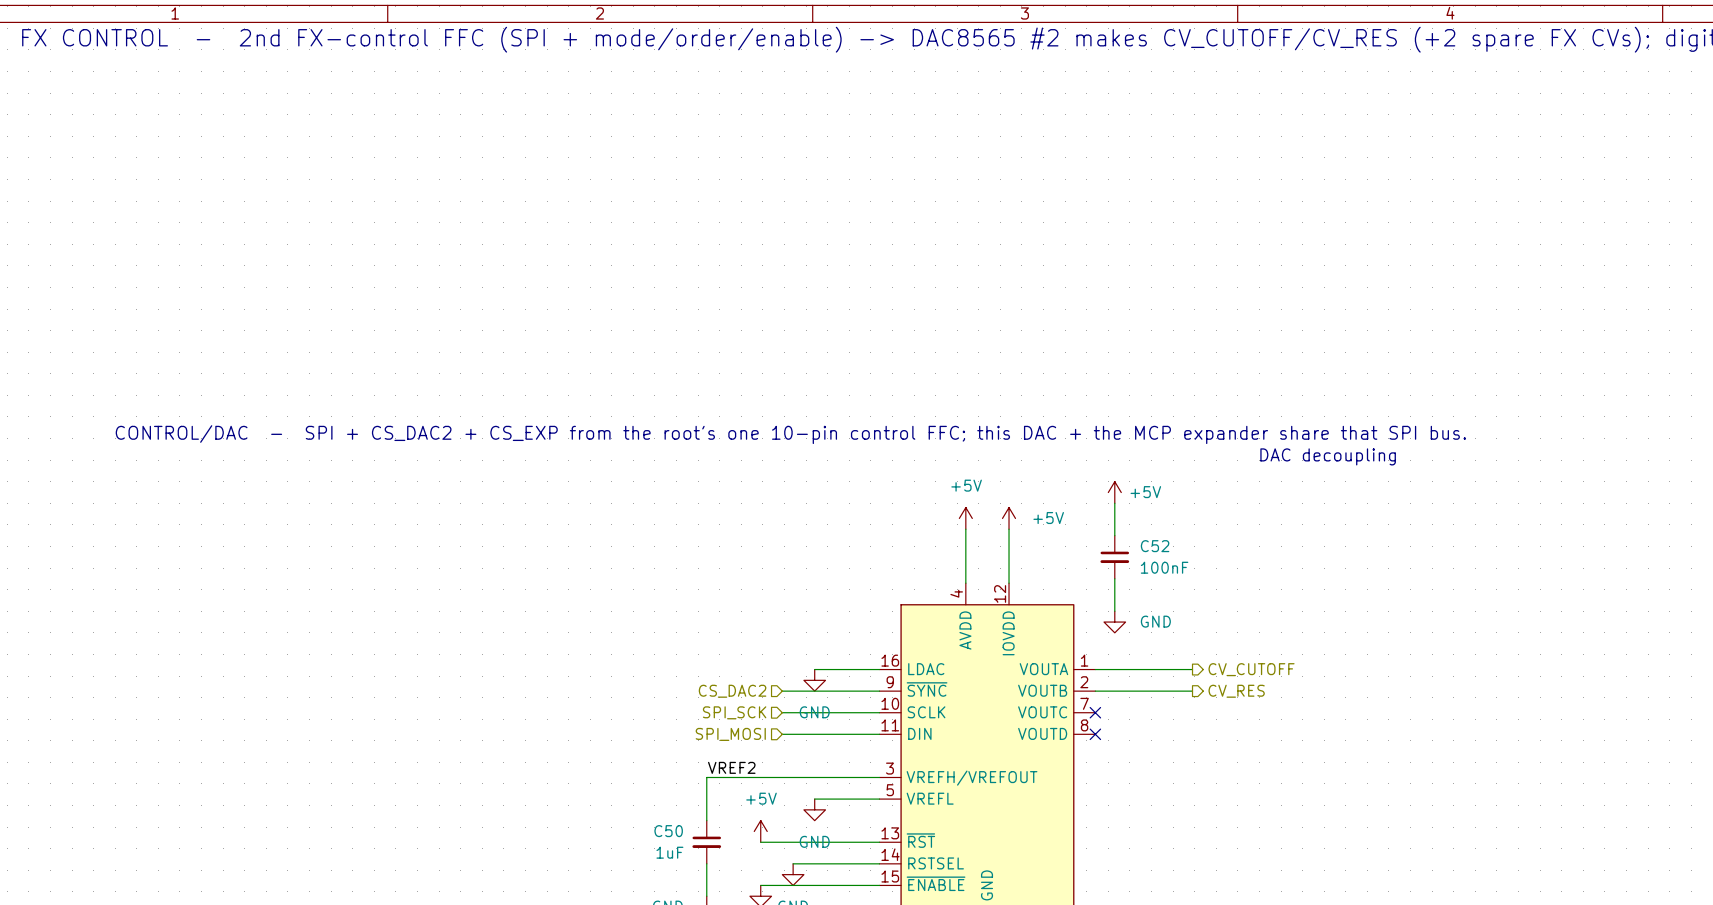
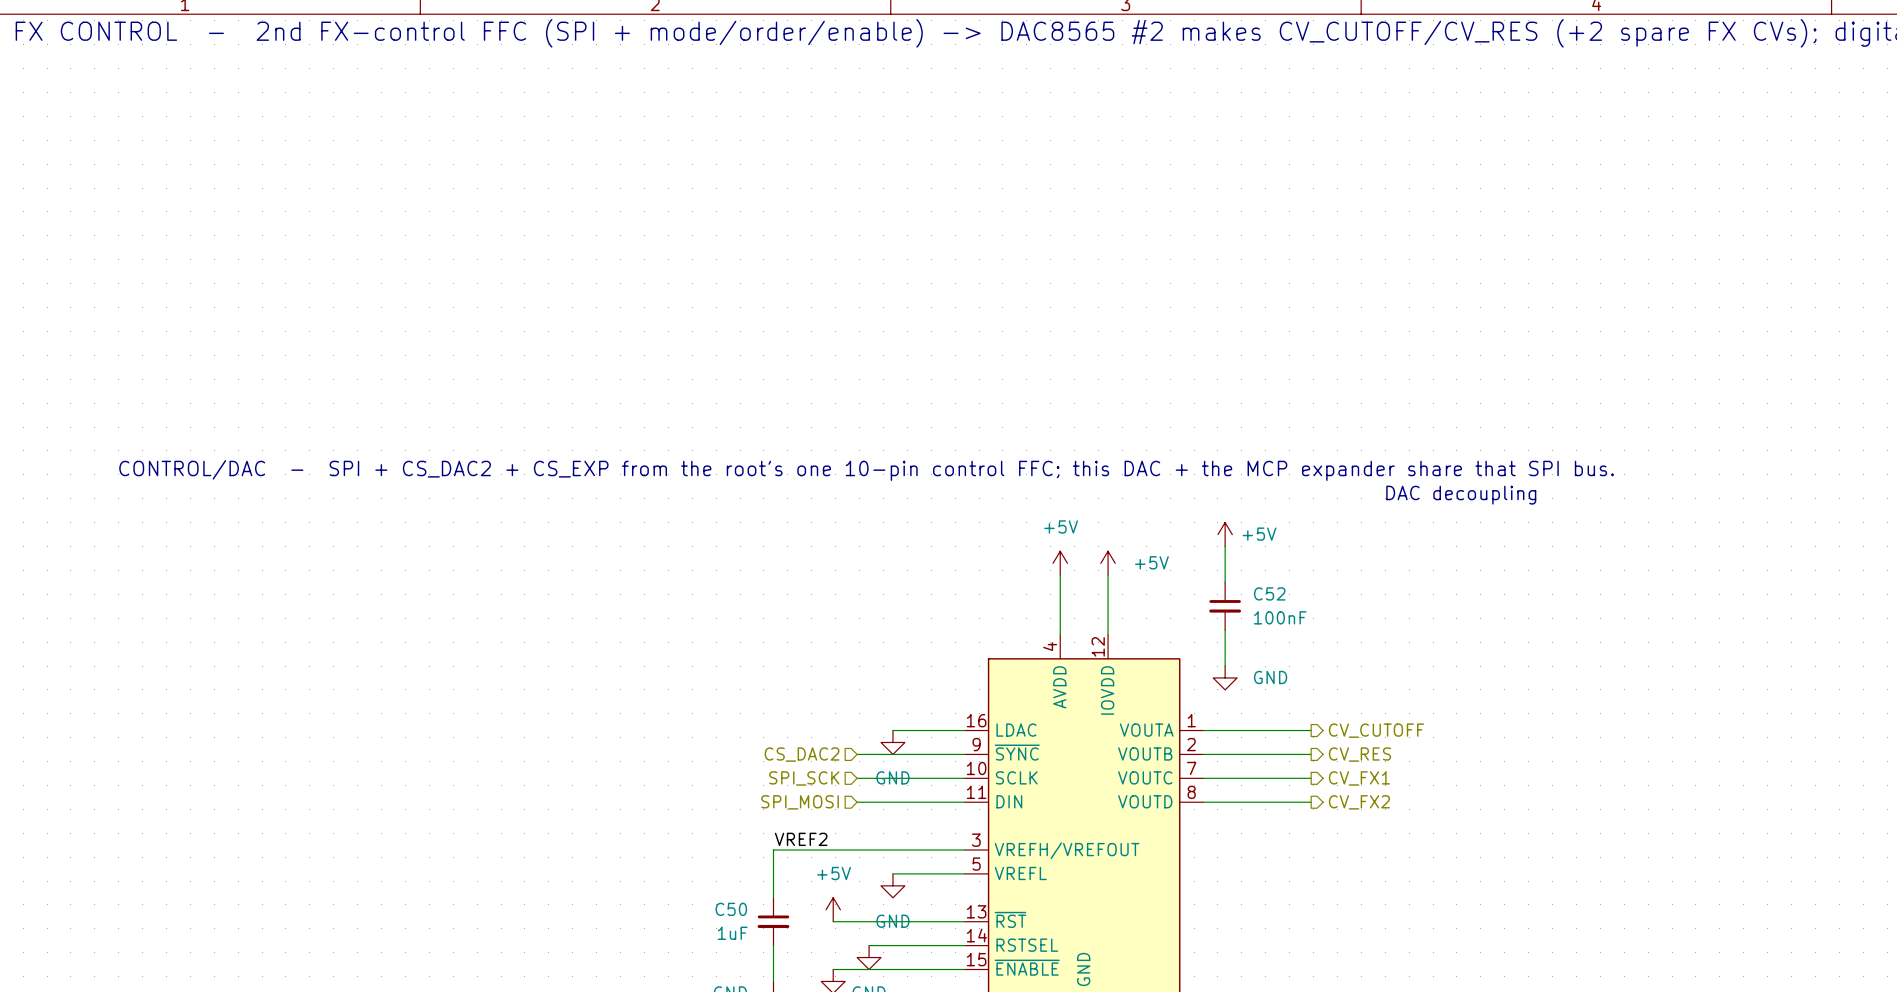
wire: none -> (1203, 778) (1311, 778)
no-connect mark: (1095, 712) -> none
hierarchical label: none -> CV_FX1 (1359, 778)
wire: none -> (1203, 802) (1311, 802)
no-connect mark: (1095, 734) -> none
hierarchical label: none -> CV_FX2 (1359, 802)

